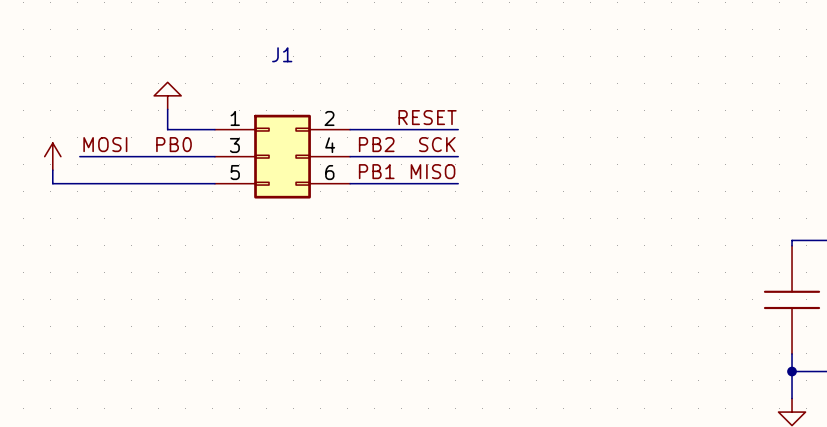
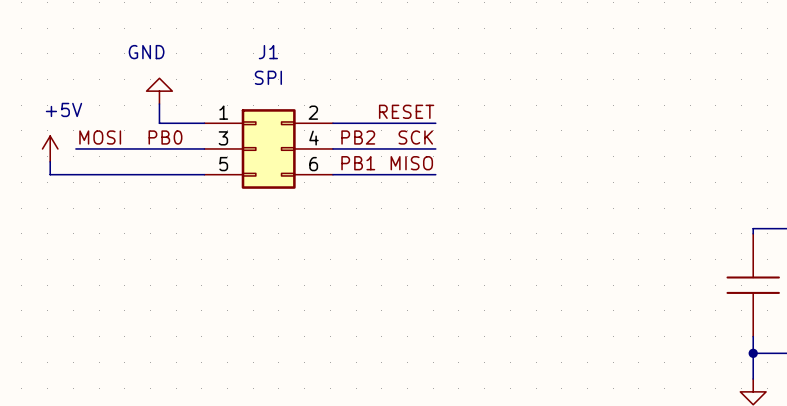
power symbol text: none -> GND (146, 52)
J1 value: none -> SPI (268, 77)
power symbol text: none -> +5V (63, 109)

